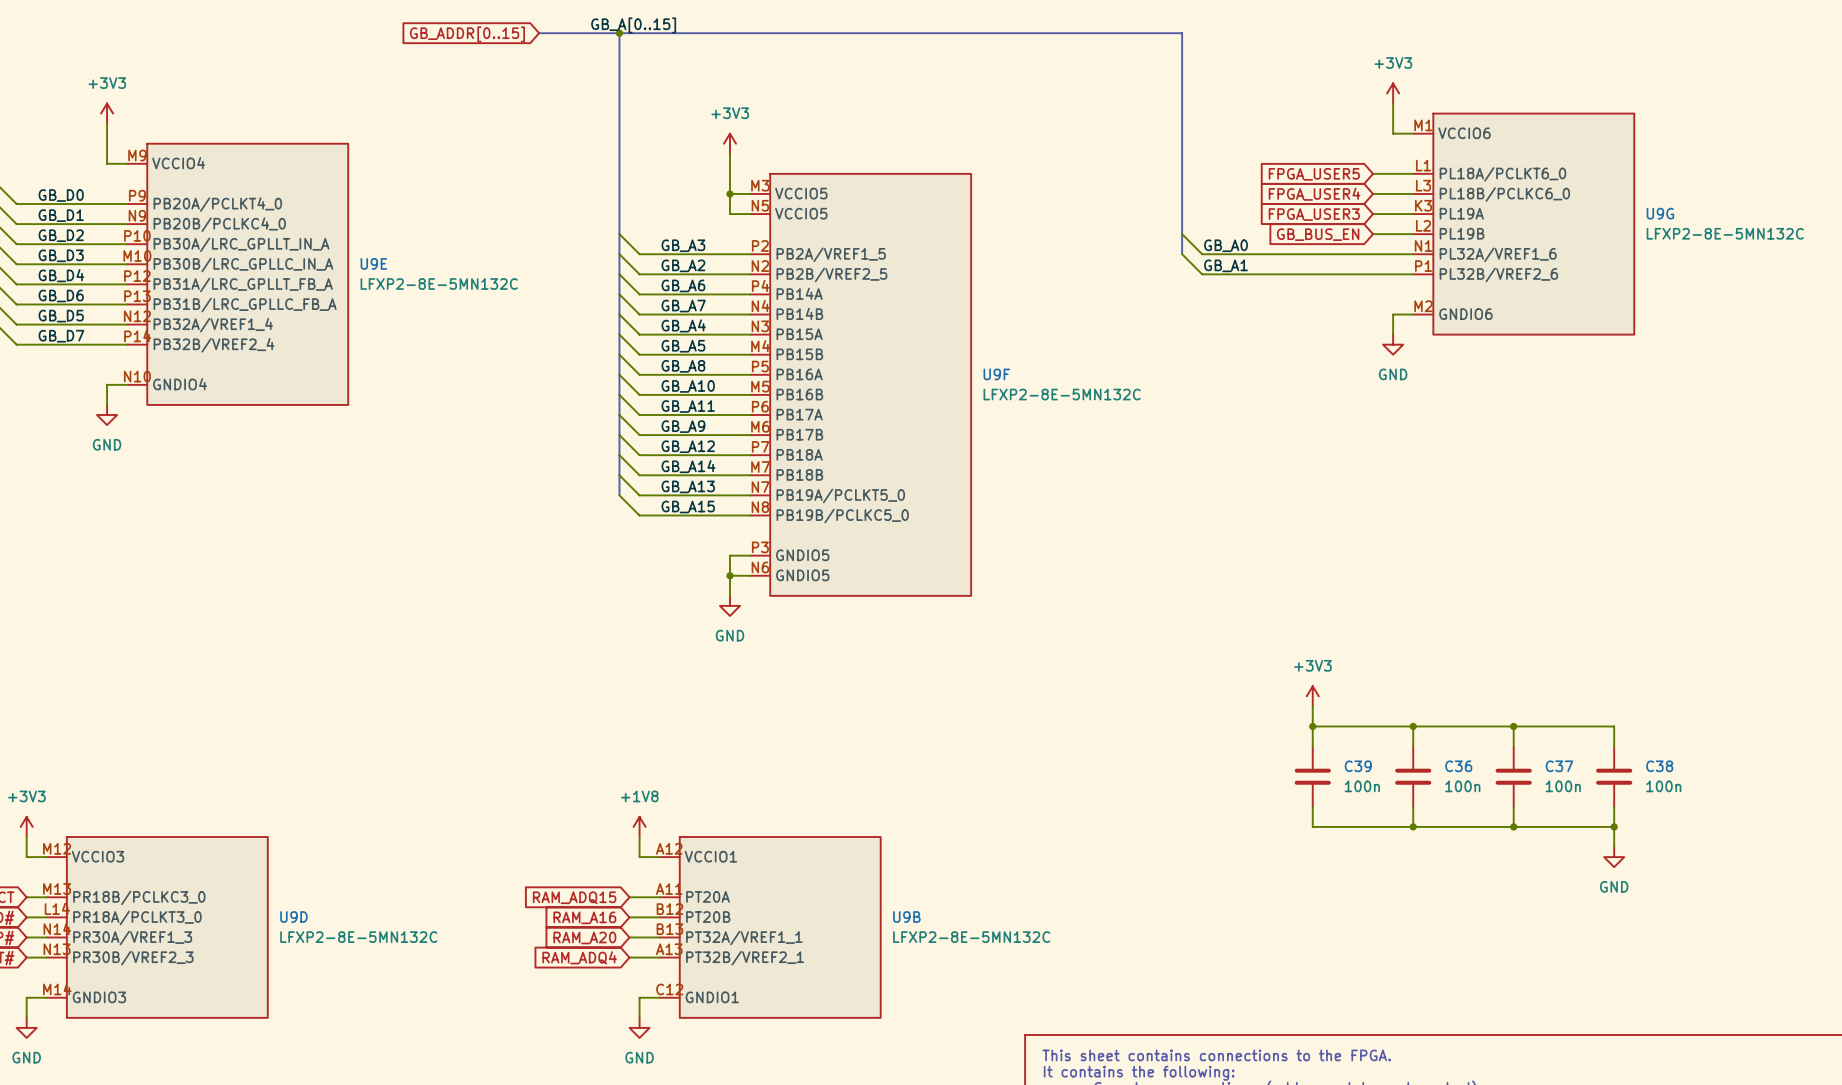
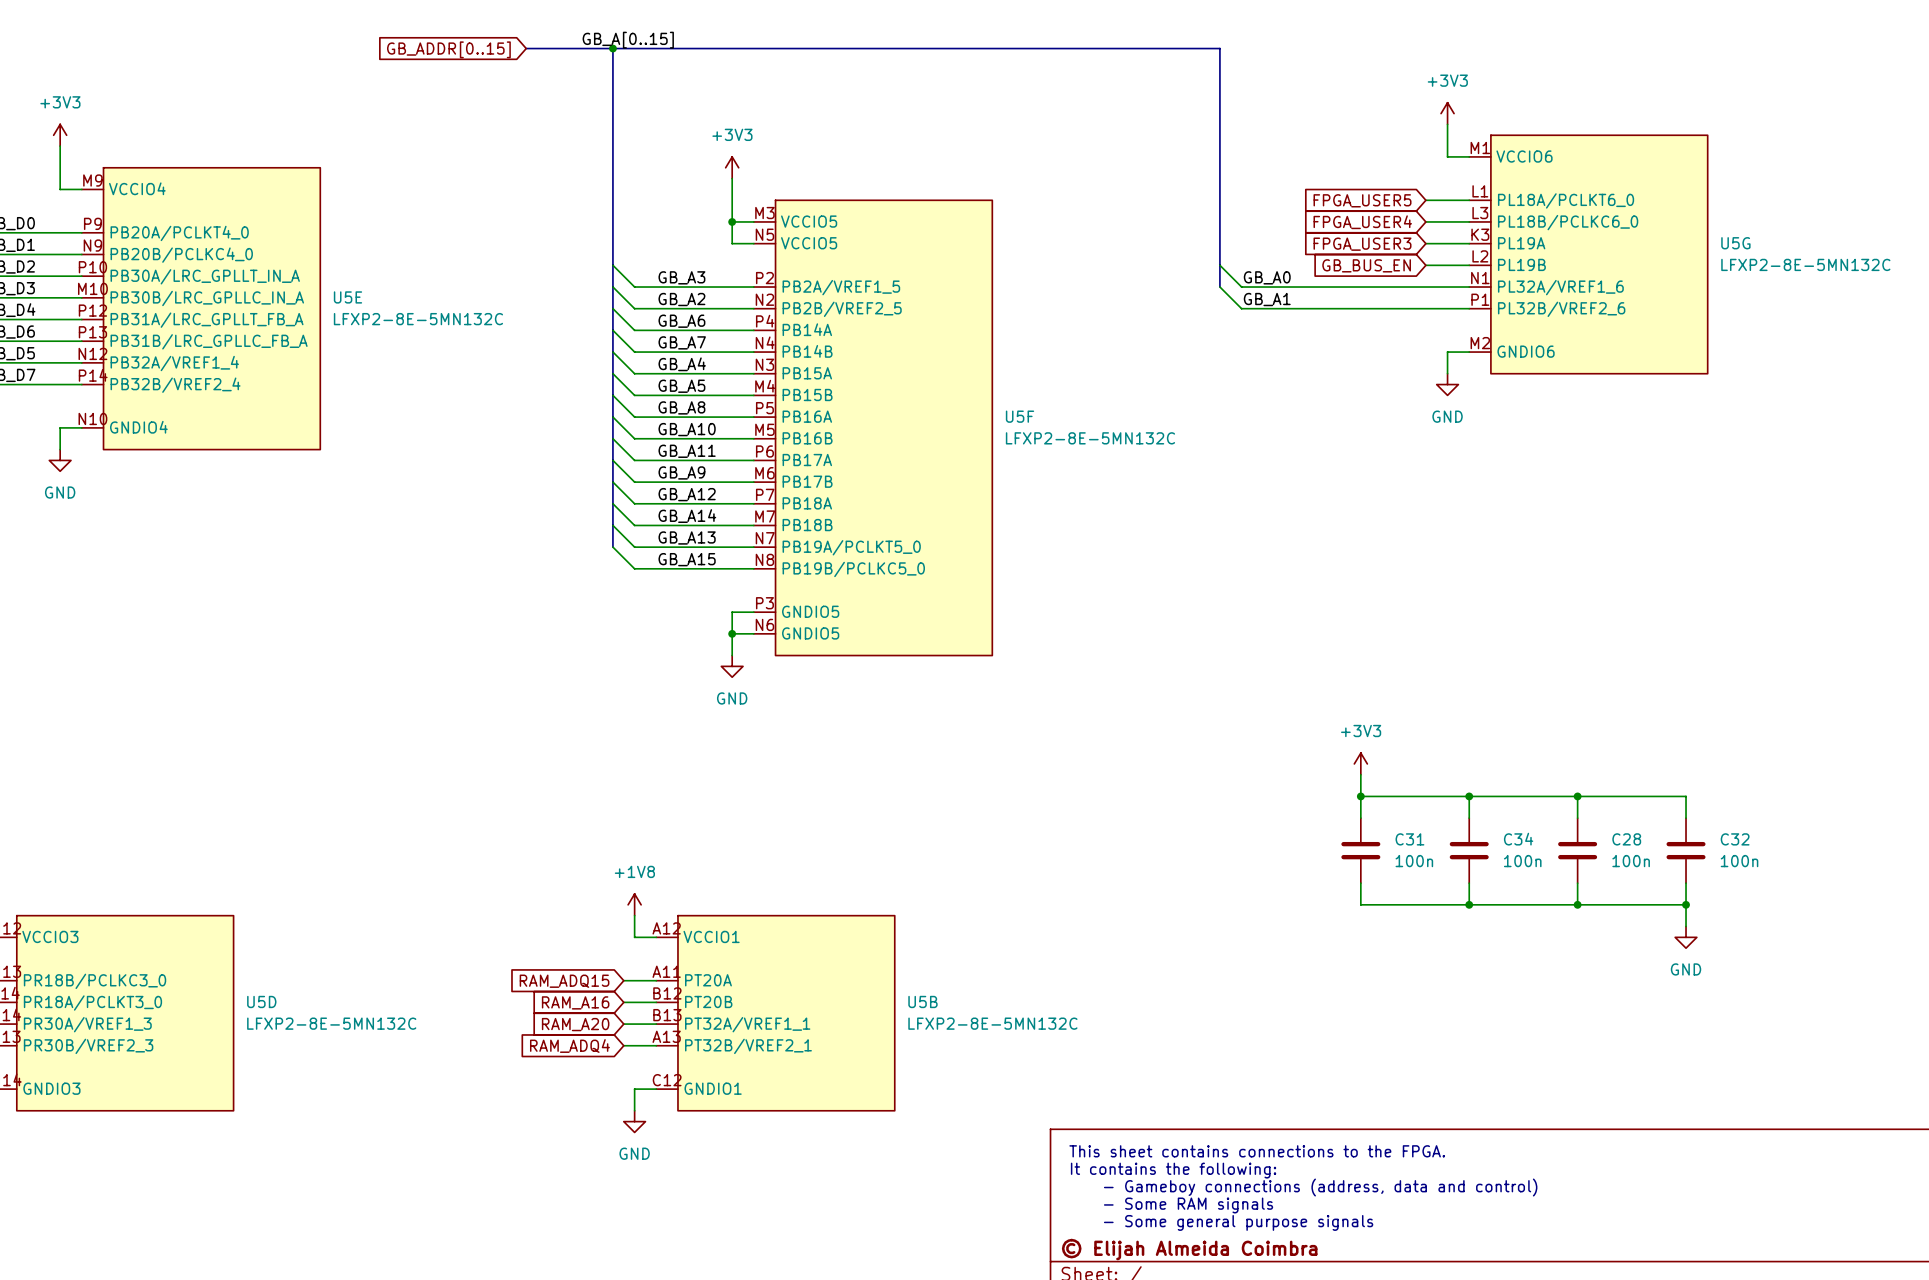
U9G name: U9G (1660, 213) -> U5G (1735, 243)
U9E name: U9E (373, 263) -> U5E (347, 297)
U9F name: U9F (996, 374) -> U5F (1020, 416)
C39 name: C39 (1358, 766) -> C31 (1409, 839)
C36 name: C36 (1458, 766) -> C34 (1518, 839)
C37 name: C37 (1559, 766) -> C28 (1626, 839)
C38 name: C38 (1659, 766) -> C32 (1735, 839)
U9D name: U9D (293, 917) -> U5D (261, 1001)
U9B name: U9B (906, 917) -> U5B (922, 1001)

